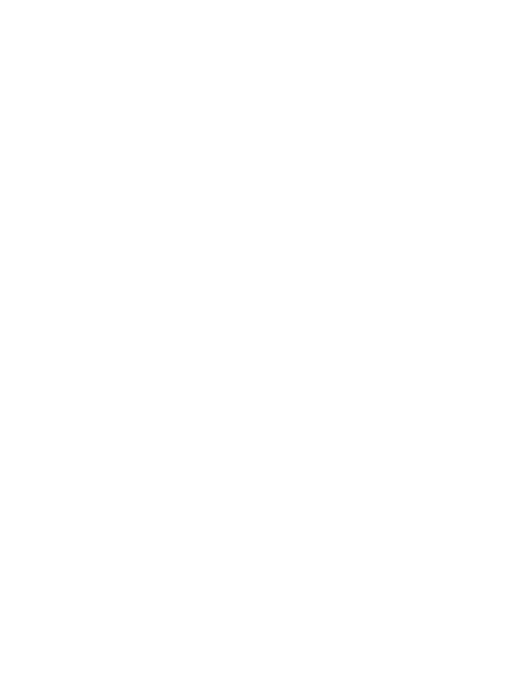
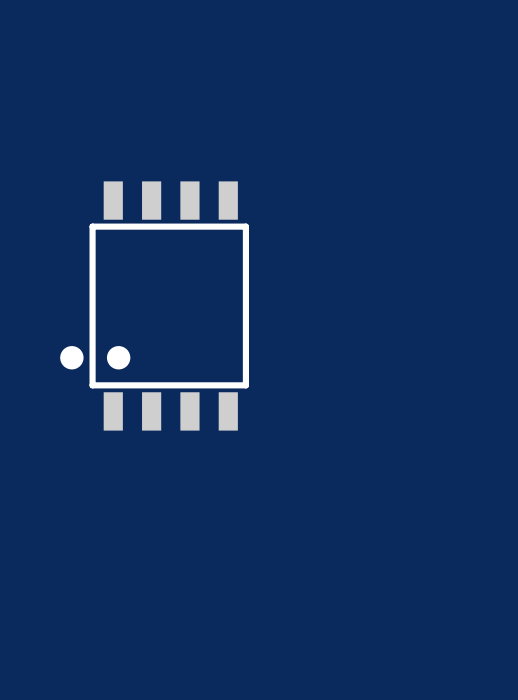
part: none -> (154, 305)

